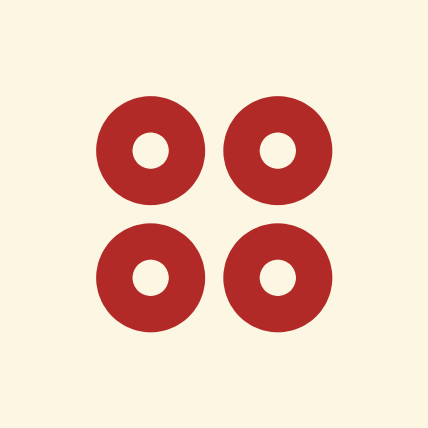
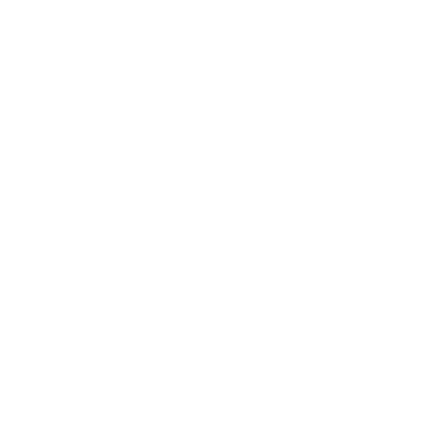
part: (150, 150) -> none
part: (277, 150) -> none
part: (150, 277) -> none
part: (277, 277) -> none

